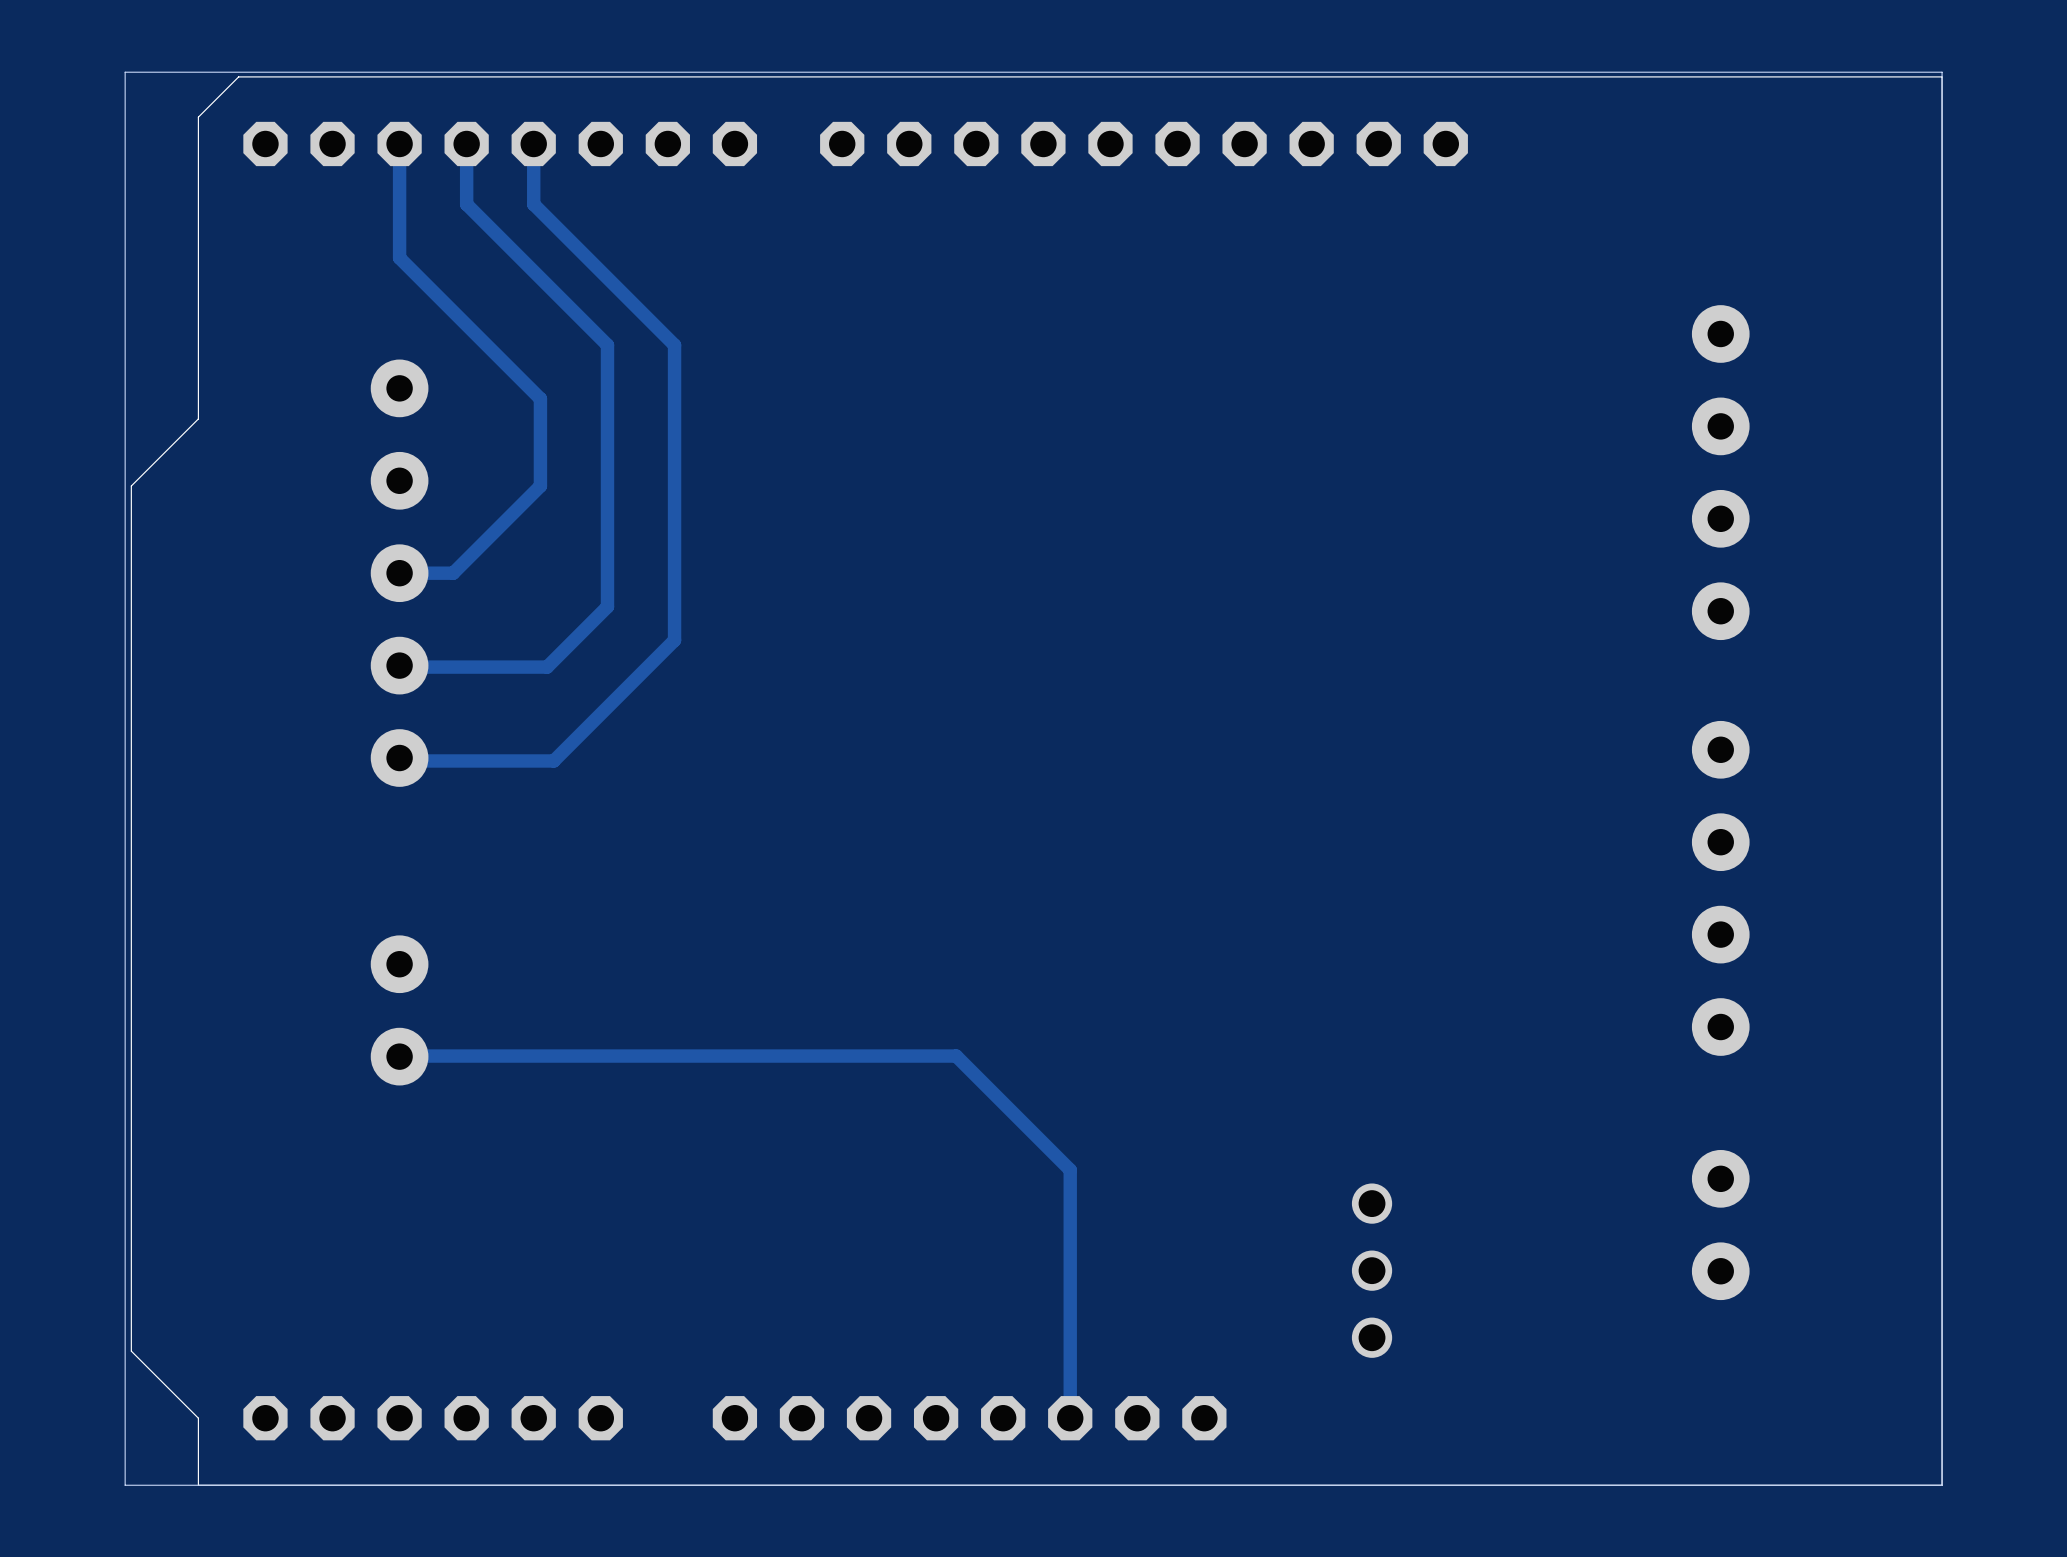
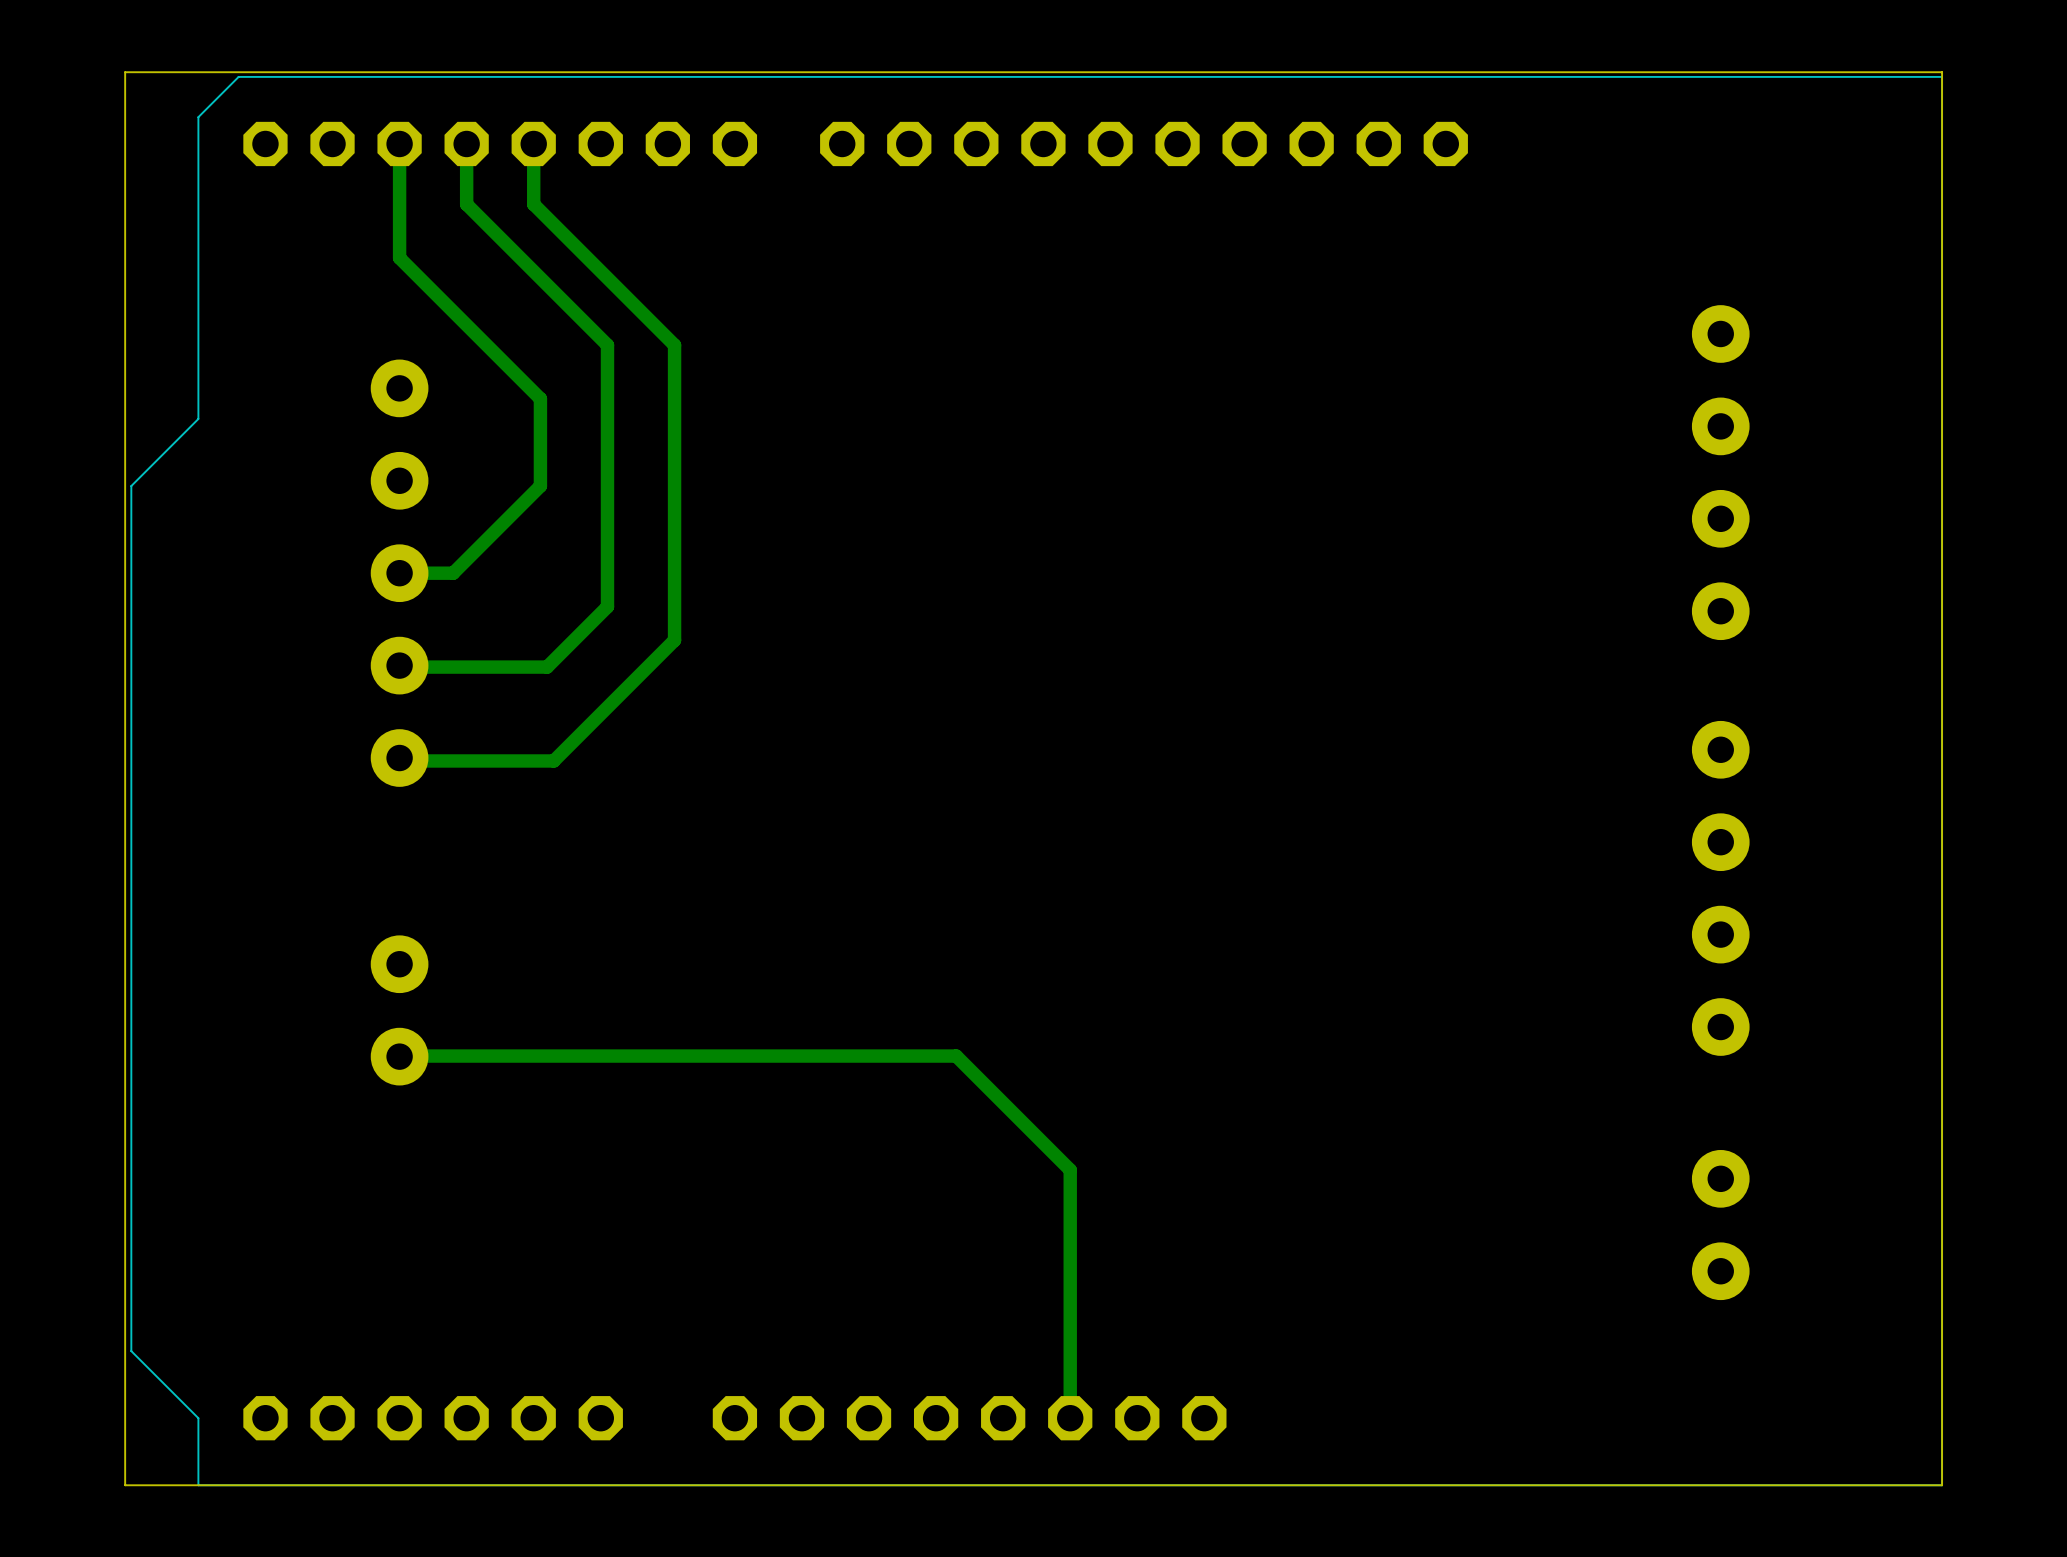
part: (1372, 1270) -> none

